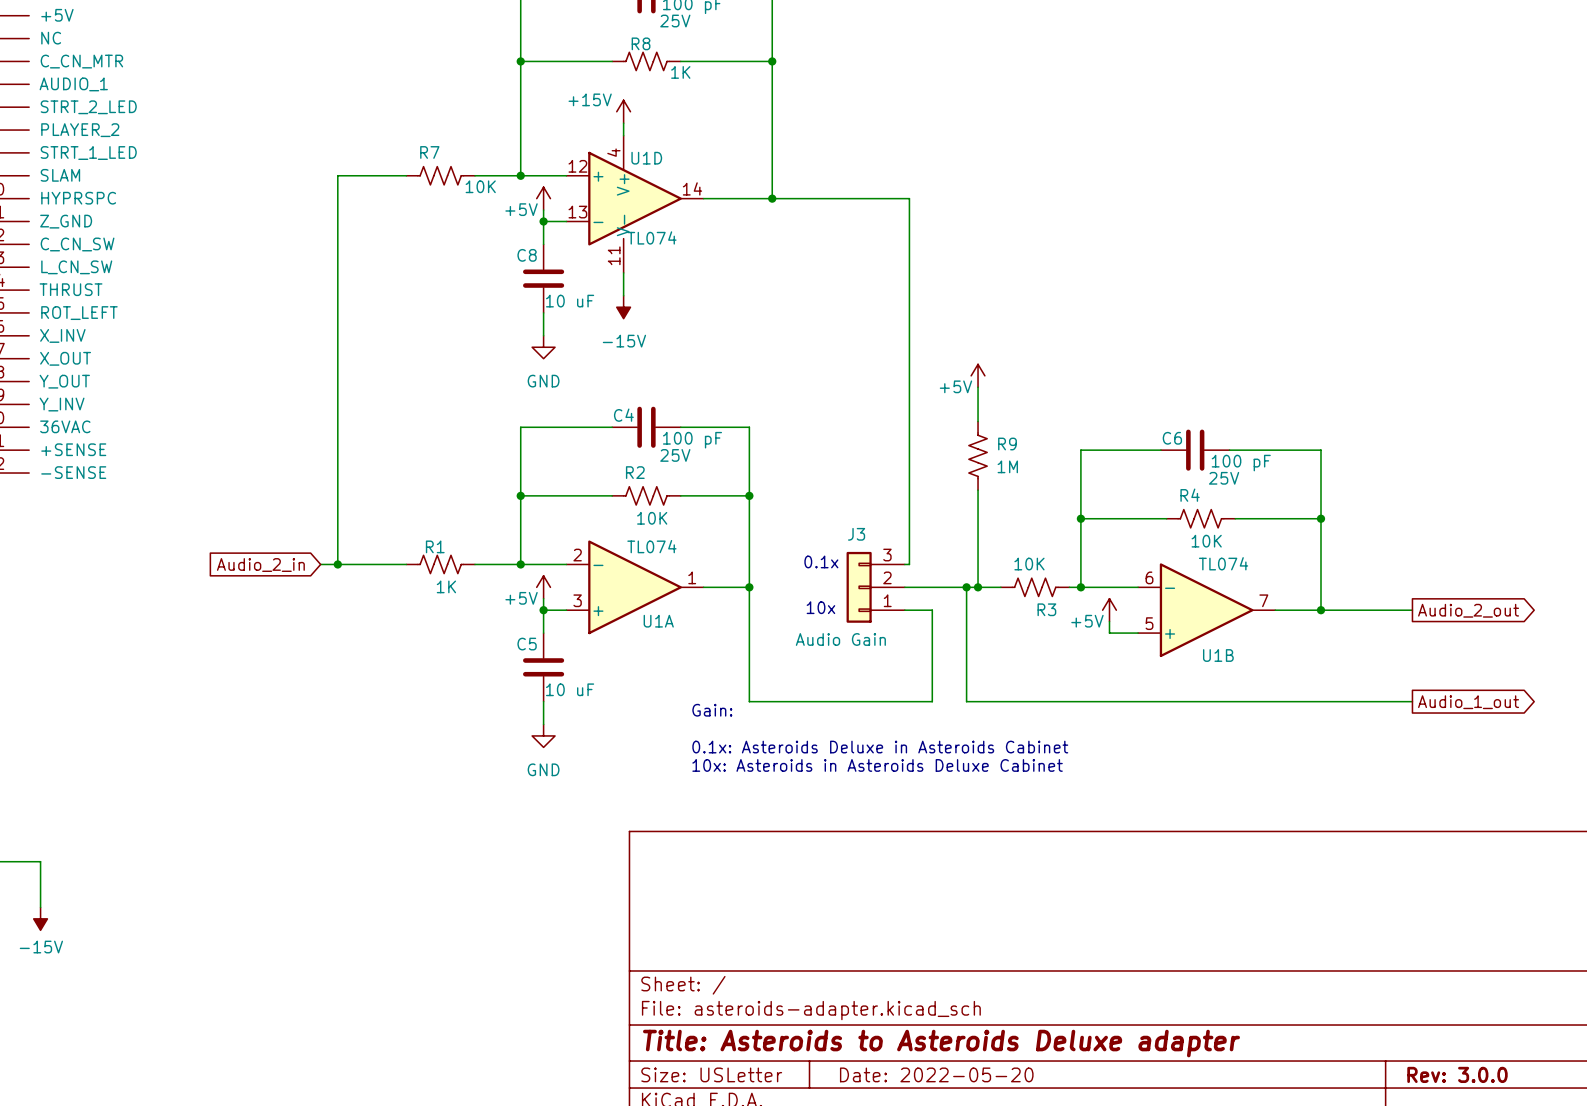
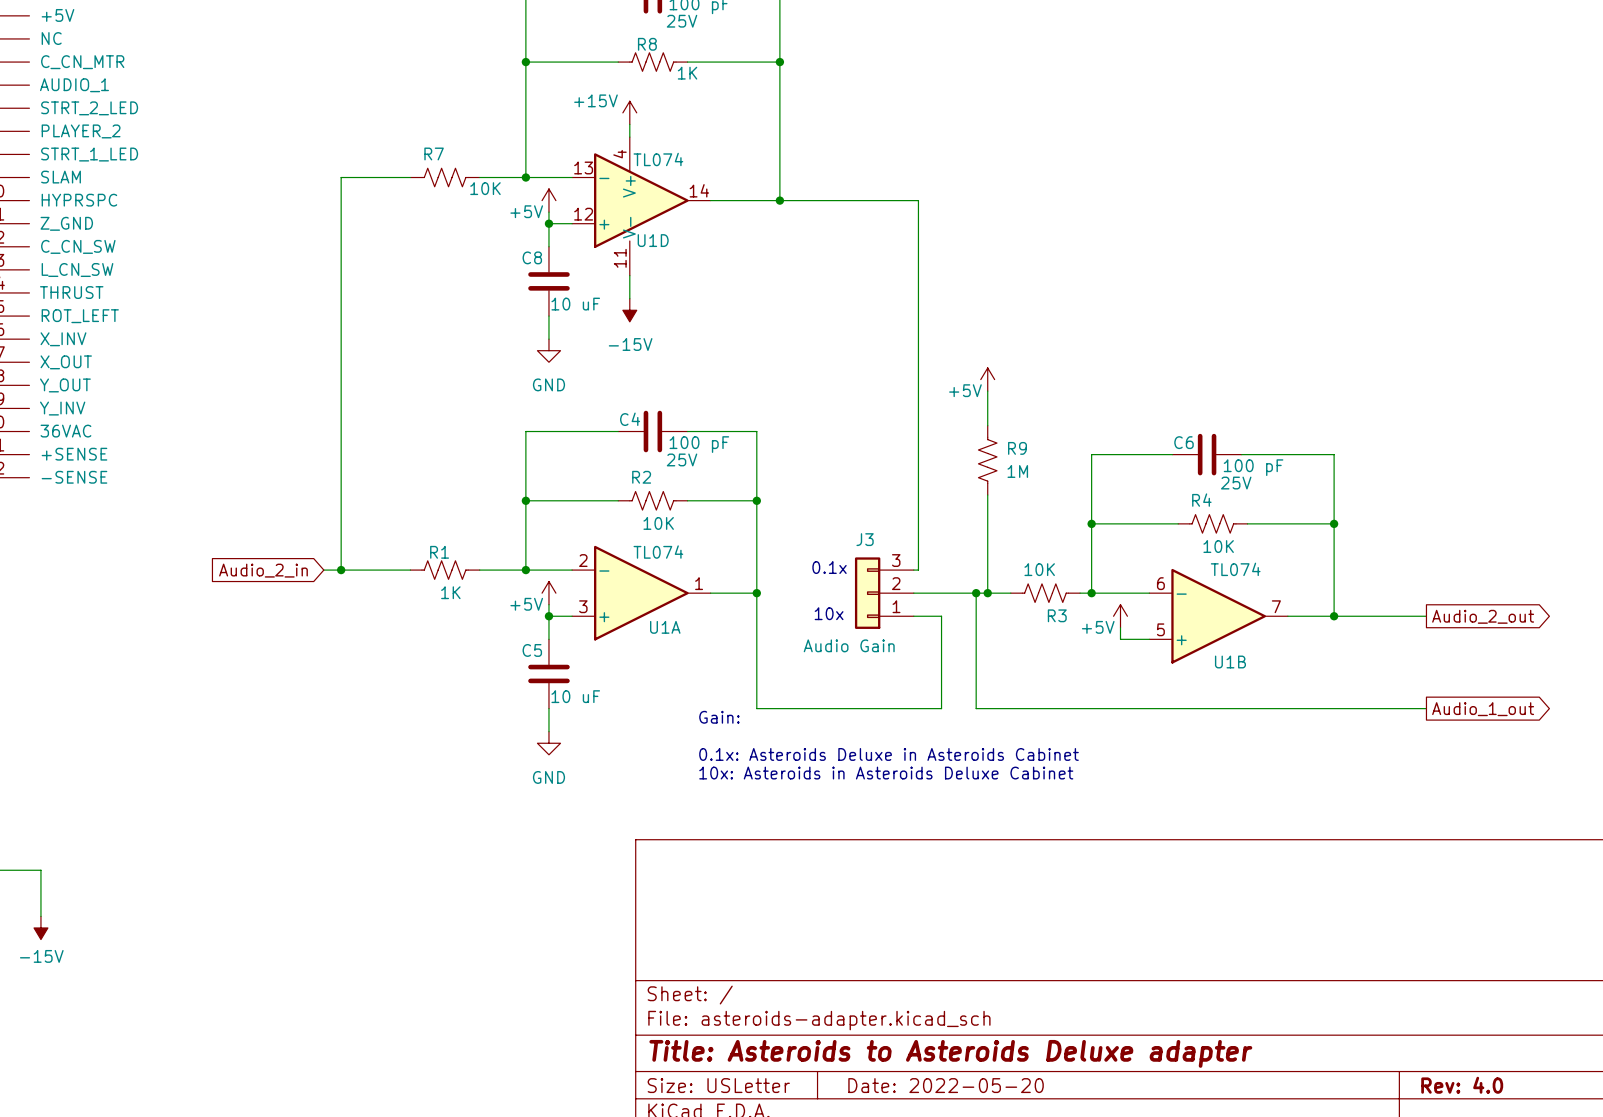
U1D flip: as is (635, 198) -> up-down (641, 200)
title block: Rev: 3.0.0 (1457, 1074) -> Rev: 4.0 (1462, 1085)

